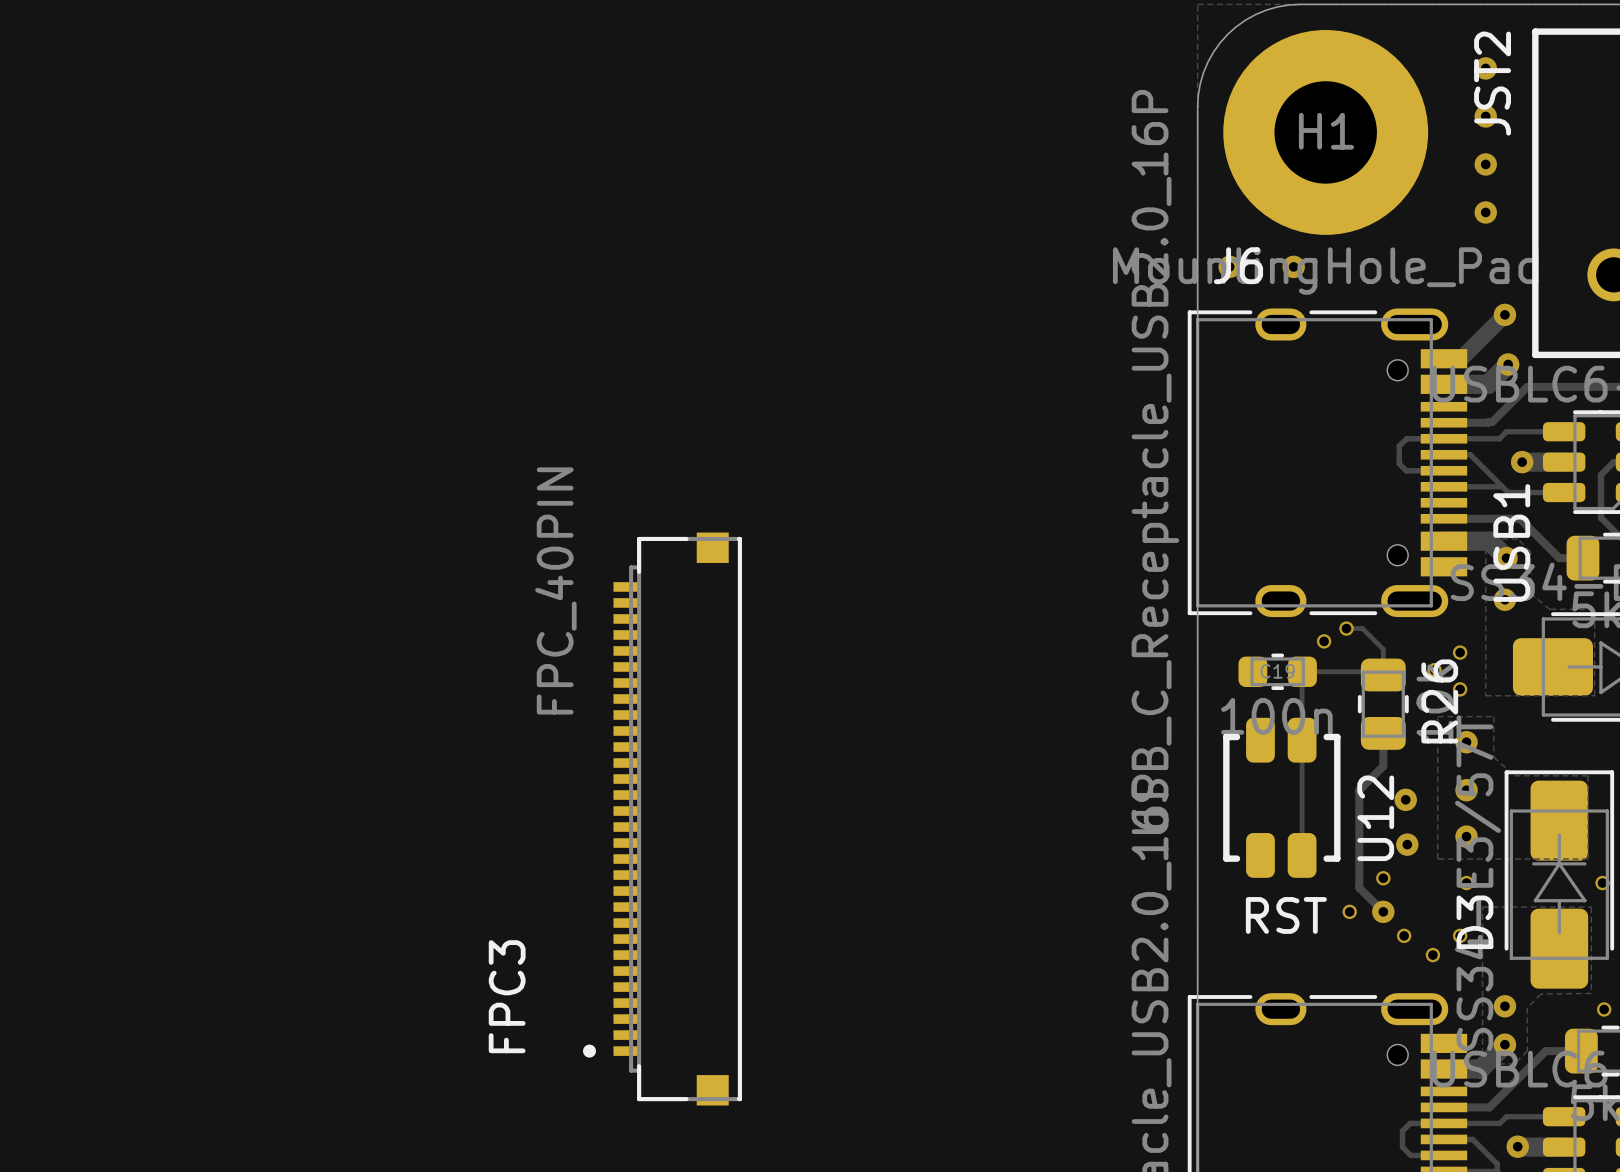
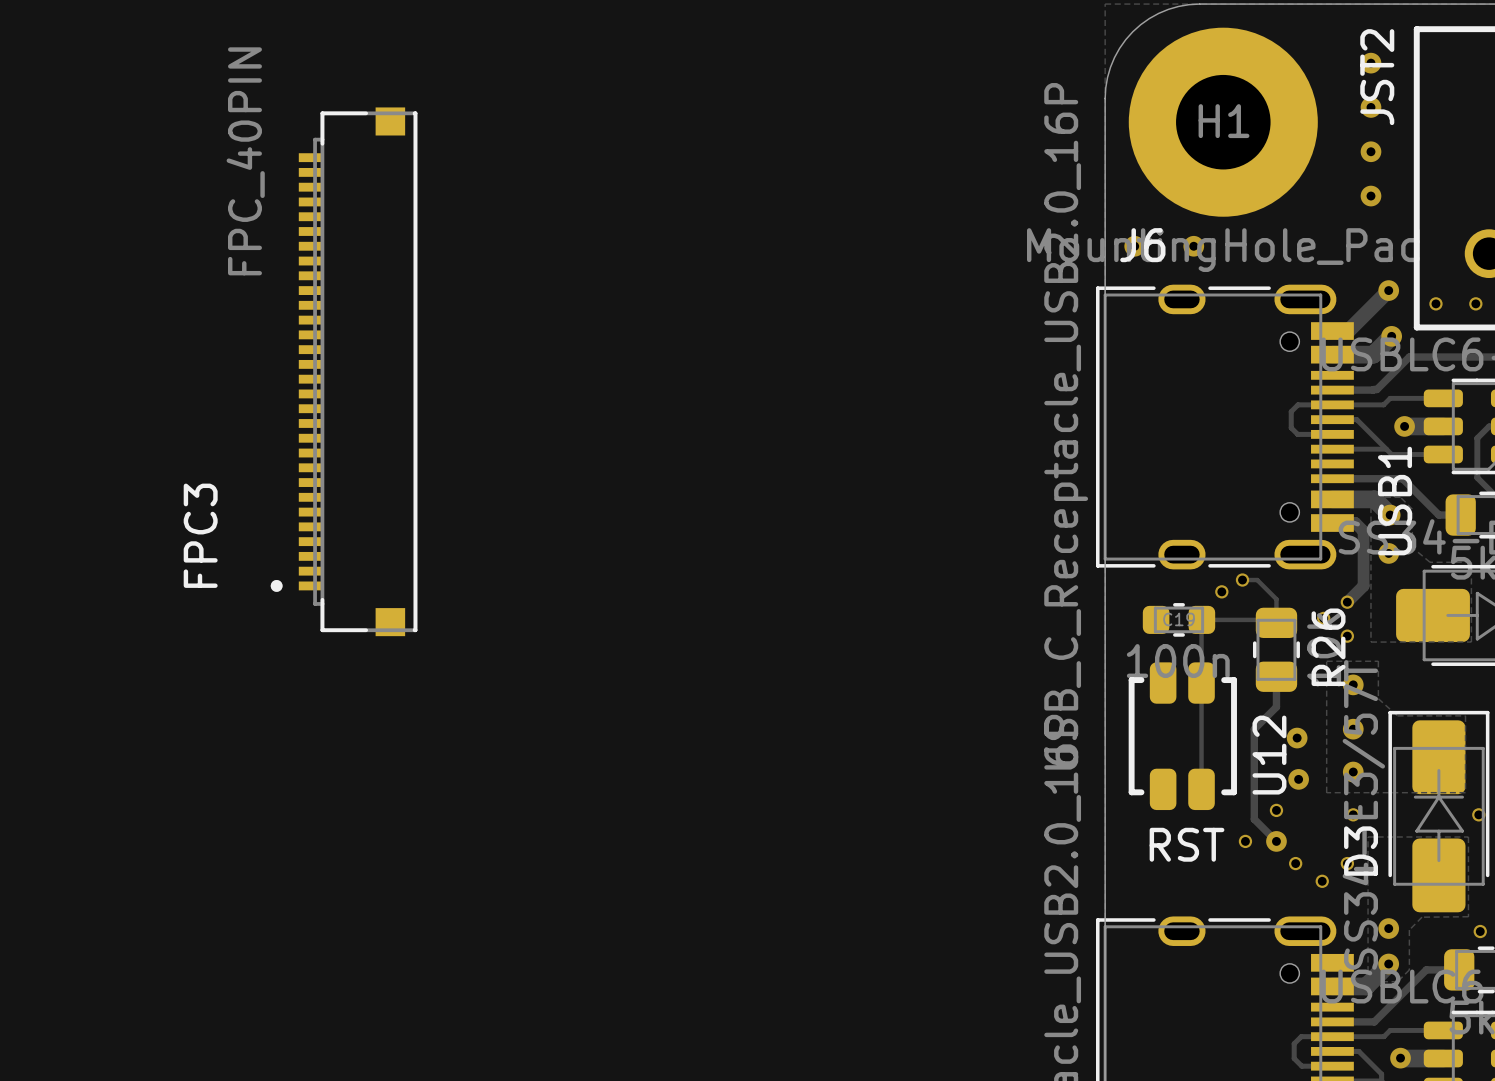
via: none -> (1435, 303)
via: none -> (1475, 303)
track: none -> (1332, 523) (1355, 523) (1363, 531) (1363, 585) (1347, 602)
FPC3 position: (662, 819) -> (344, 371)

